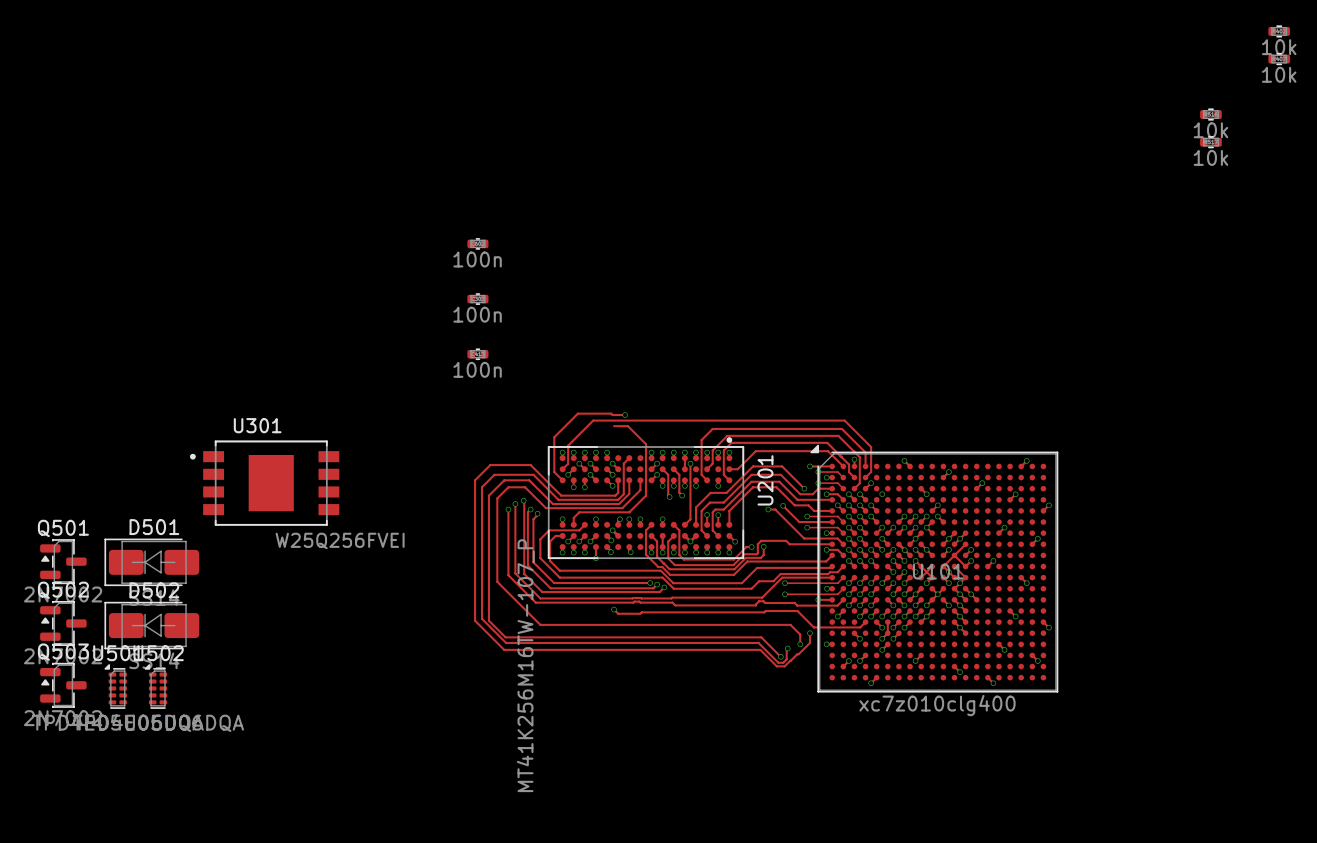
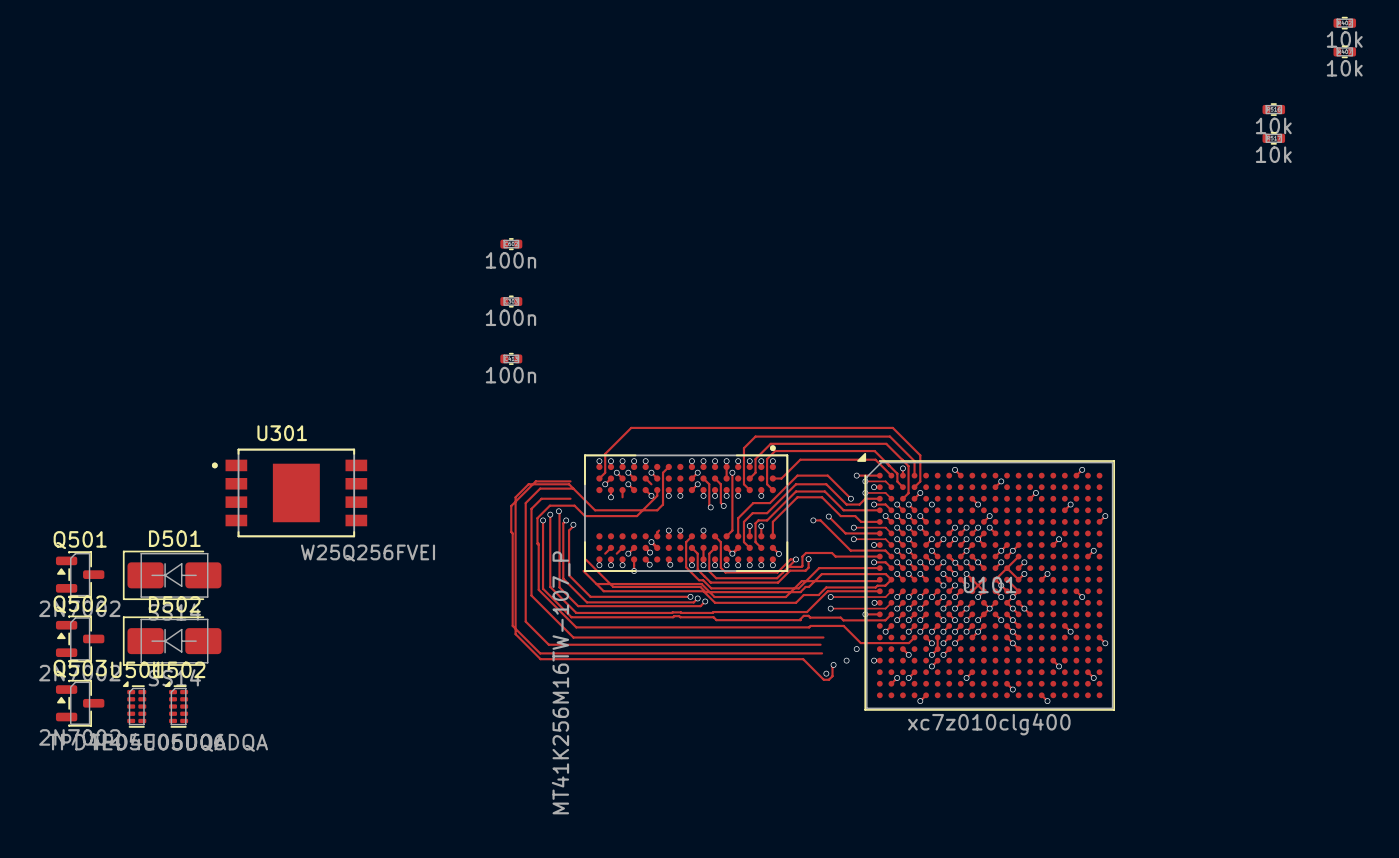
track: (625, 415) (577, 413) (554, 437) (554, 472) (562, 480) -> none
via: (625, 415) -> none
track: (614, 426) (627, 426) (646, 444) (646, 495) (629, 512) (579, 512) (573, 517) (573, 524) -> none
via: (612, 474) -> none
track: (504, 480) (529, 480) (552, 503) (619, 503) (629, 493) (629, 485) -> (538, 490) (573, 488)
U201 name: U201 (765, 480) -> none
track: (618, 485) (618, 492) (615, 495) (561, 495) (530, 465) (490, 465) (475, 480) (475, 620) (504, 649) (760, 649) (776, 666) (784, 666) (809, 642) (809, 633) -> (657, 495) (637, 516) (584, 516) (574, 505) (549, 505) (537, 518) (538, 545)
via: none -> (668, 495)
track: (640, 485) (640, 490) (622, 508) (545, 508) (525, 487) (507, 488) -> (570, 498) (541, 498)
via: none -> (680, 495)
via: (584, 487) -> none
track: (491, 492) (488, 495) (488, 620) -> (570, 481) (535, 481) (511, 505) (512, 625) (522, 636)
track: none -> (525, 503) (525, 621) (548, 644) (820, 644)
via: (562, 519) -> none
via: (595, 519) -> none
via: (619, 519) -> none
track: (584, 524) (579, 530) (549, 530) (540, 539) (540, 558) (559, 577) (566, 577) -> (596, 584) (603, 591)
track: (562, 535) (555, 535) (550, 541) (550, 560) -> (583, 571) (586, 573)
via: (568, 541) -> none
via: (579, 541) -> none
track: none -> (586, 559) (613, 586) (700, 586) (705, 592) (800, 592) (805, 586) (809, 586) (821, 574) (885, 574) (891, 579)
track: (832, 555) (826, 561) (747, 561) (733, 574) -> (879, 568) (819, 568) (798, 588) (777, 588)
track: (614, 609) (618, 613) (641, 612) -> (538, 543) (538, 589) (576, 627) (681, 627)
via: (614, 609) -> none
track: (537, 622) (540, 624) (790, 624) (800, 634) (800, 644) -> (573, 637) (823, 637)
track: (761, 637) (780, 656) -> (806, 653) (822, 653)

